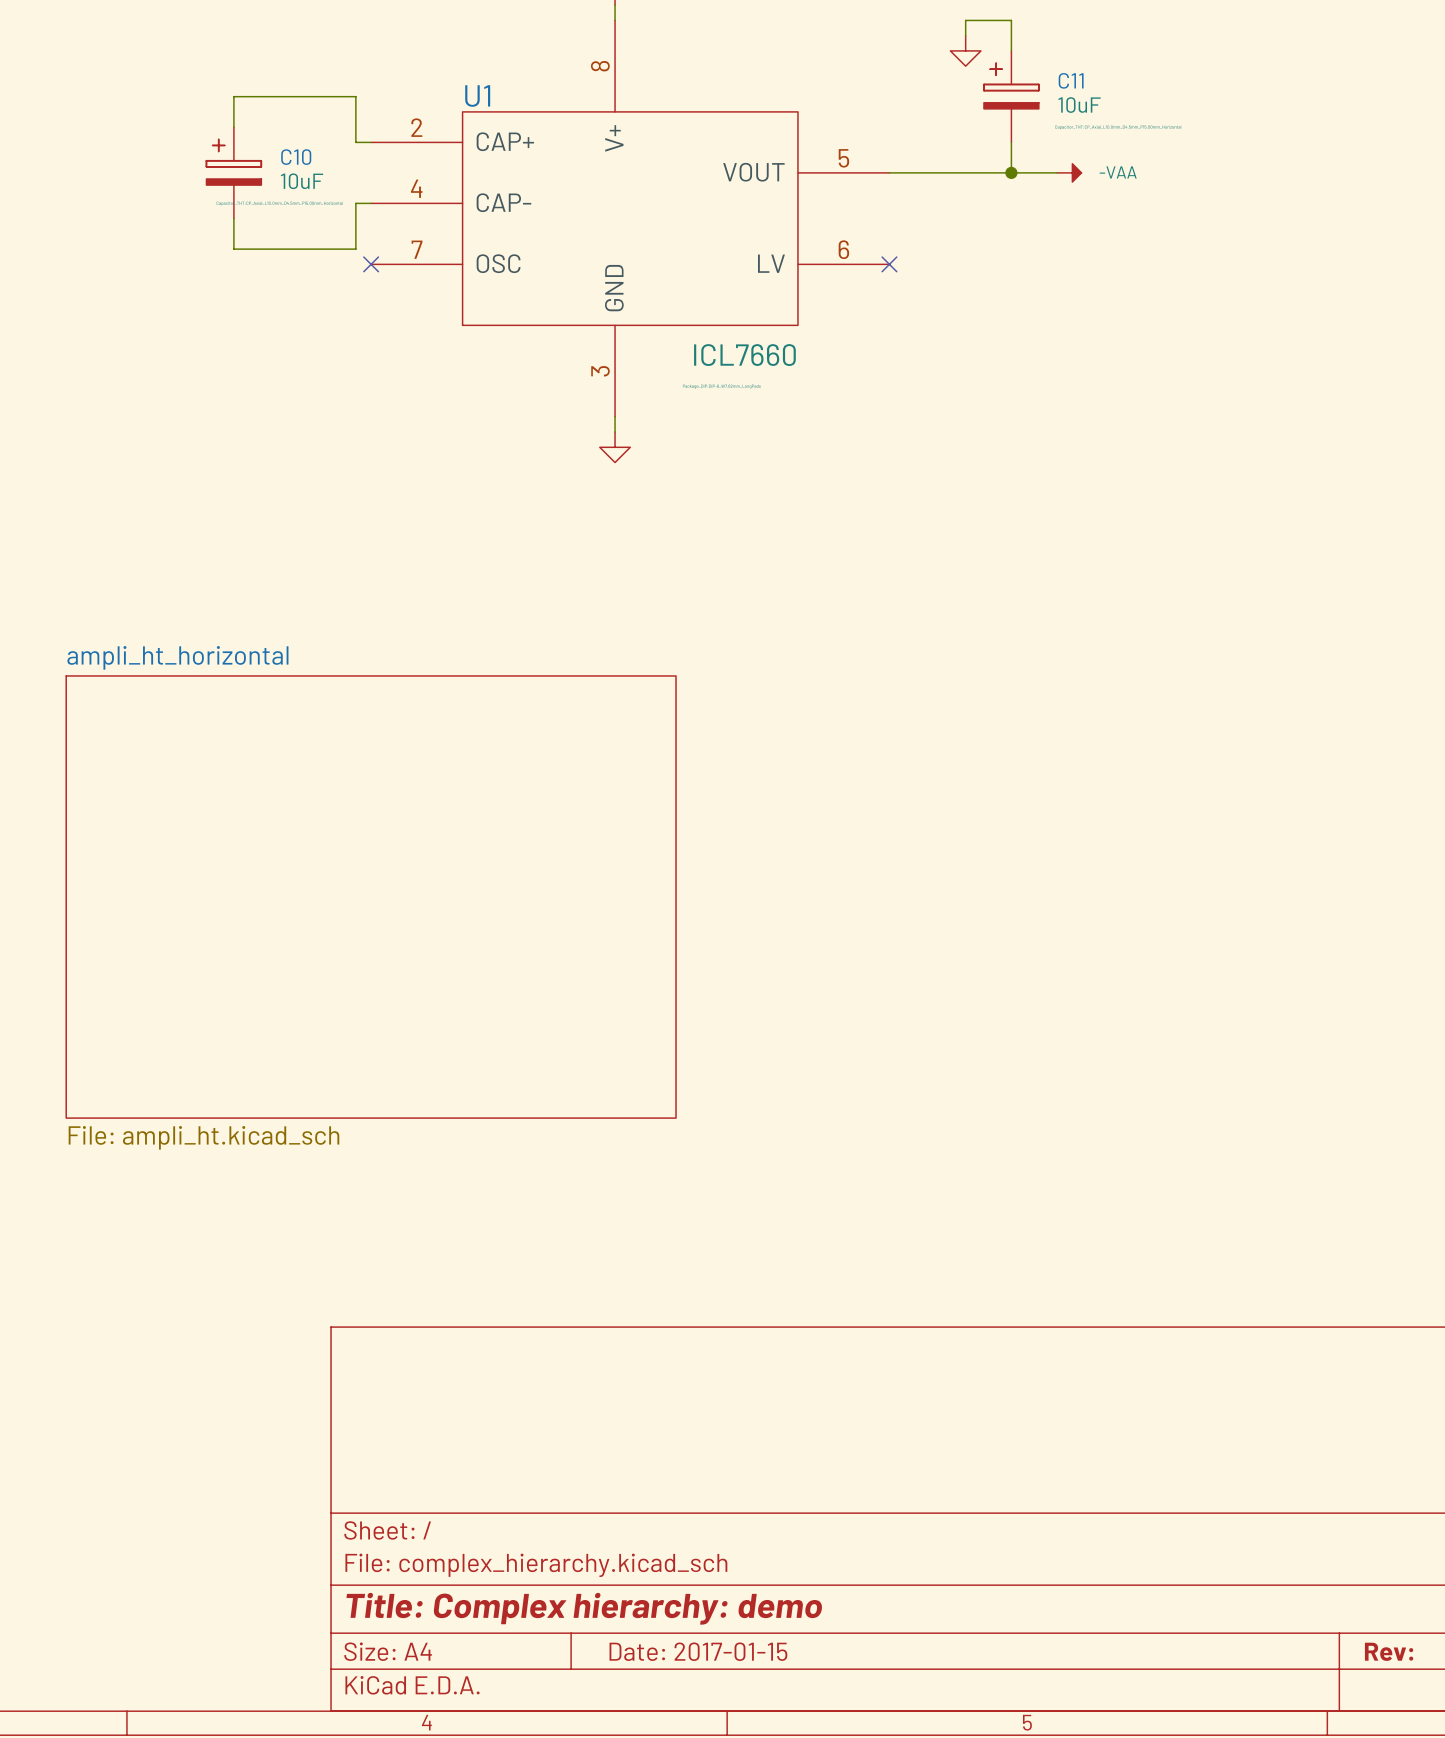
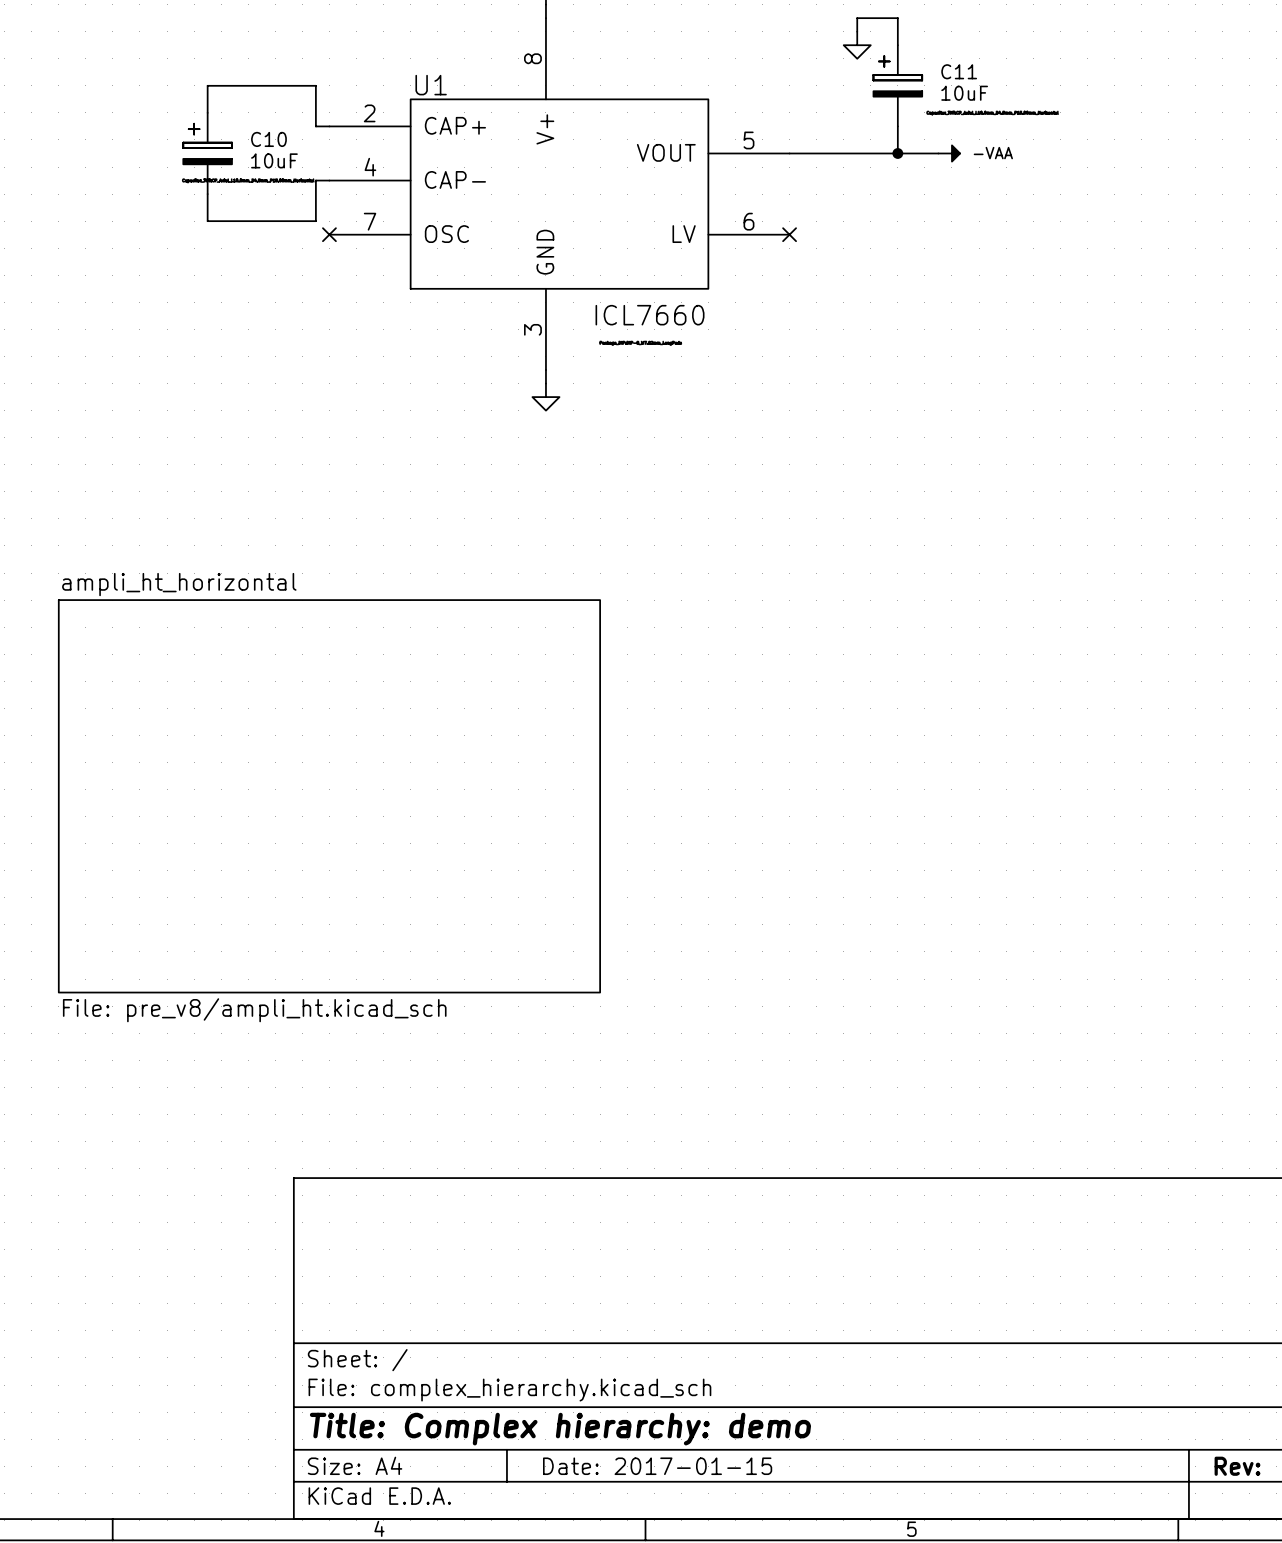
sheet ampli_ht_horizontal value: File: ampli_ht.kicad_sch (203, 1137) -> File: pre_v8/ampli_ht.kicad_sch (254, 1010)

